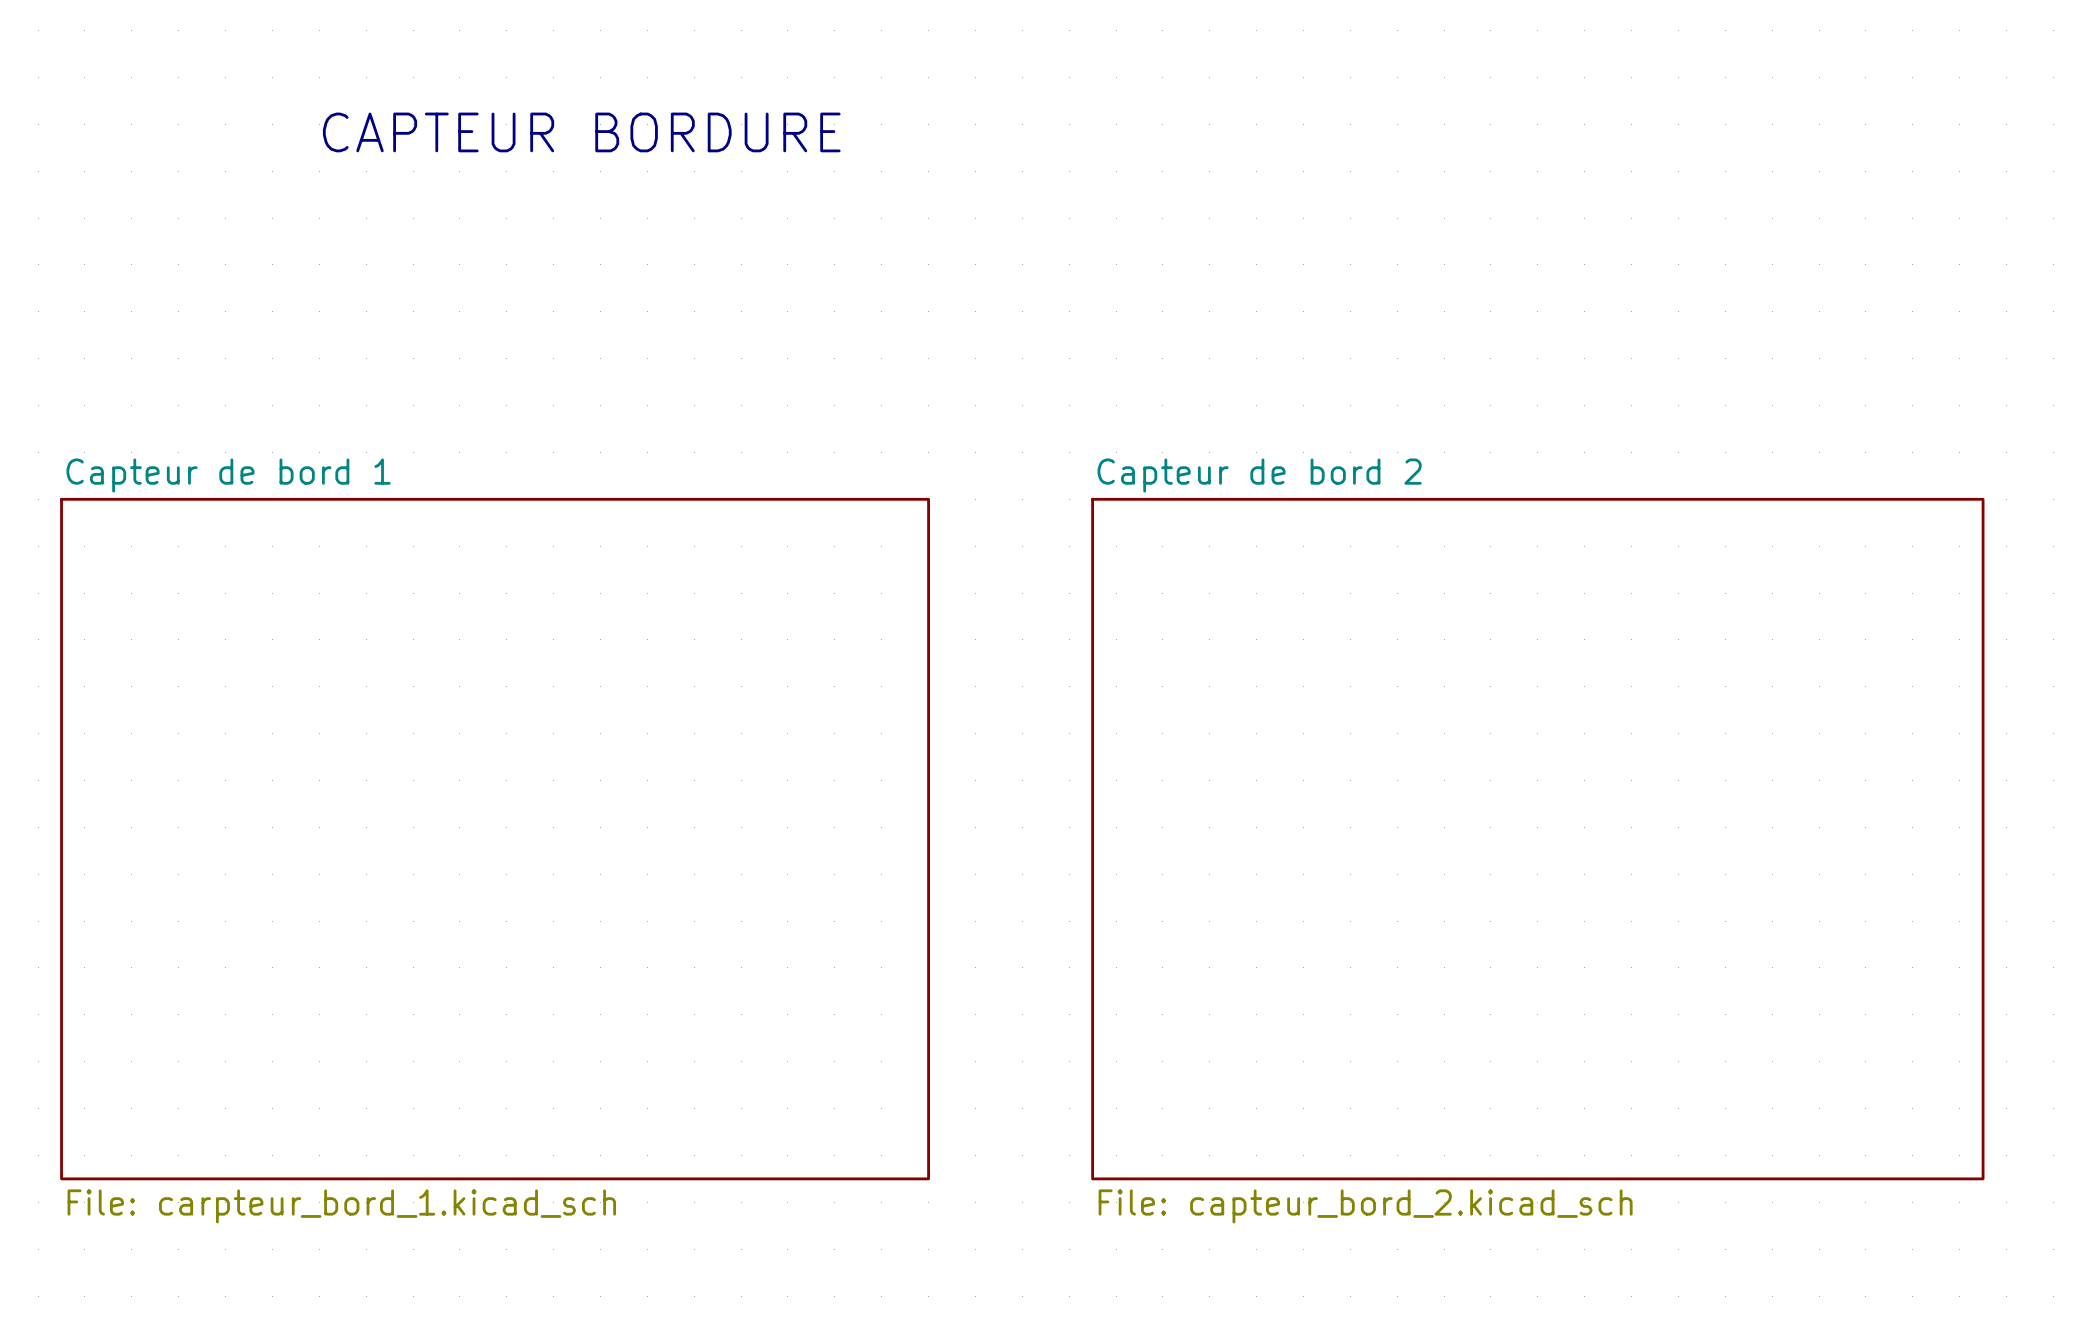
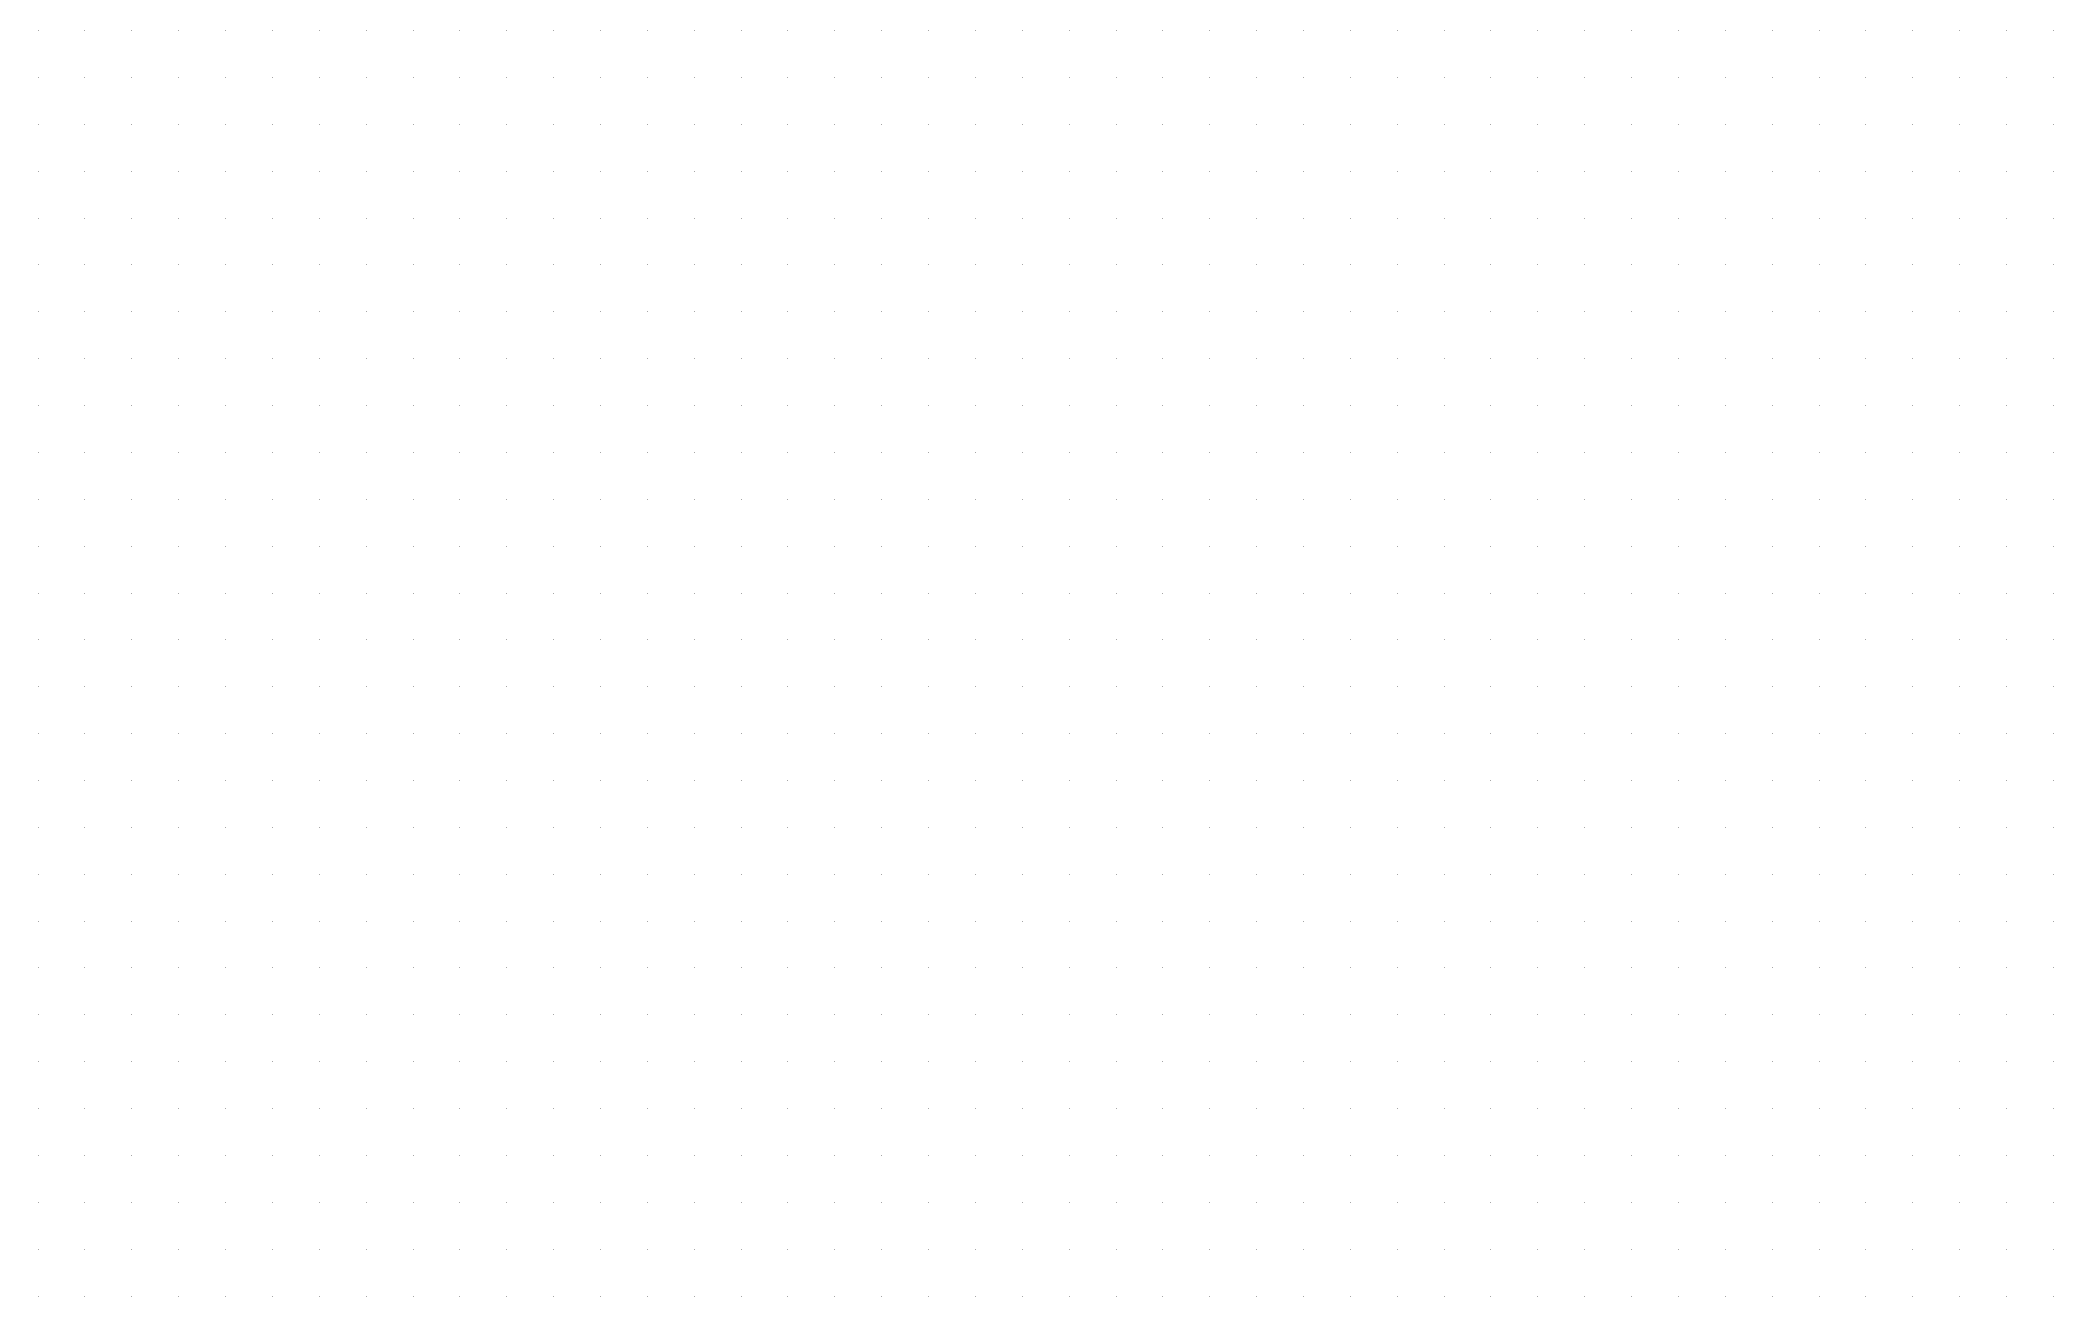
text: CAPTEUR BORDURE (581, 132) -> none
sheet Capteur de bord 1: File: carpteur_bord_1.kicad_sch (495, 839) -> none
sheet Capteur de bord 2: File: capteur_bord_2.kicad_sch (1537, 839) -> none

